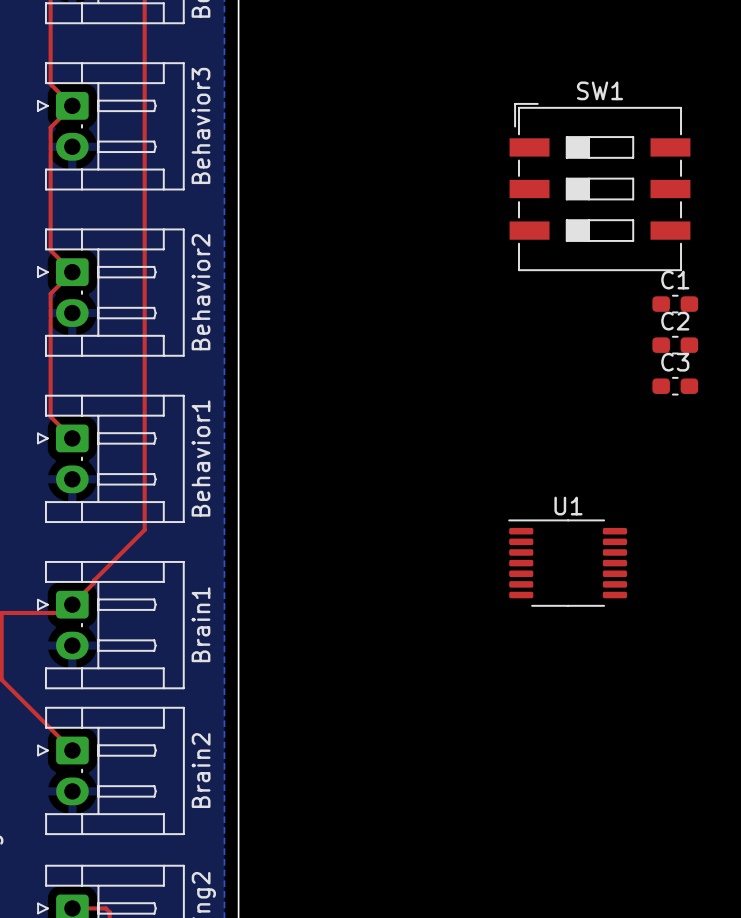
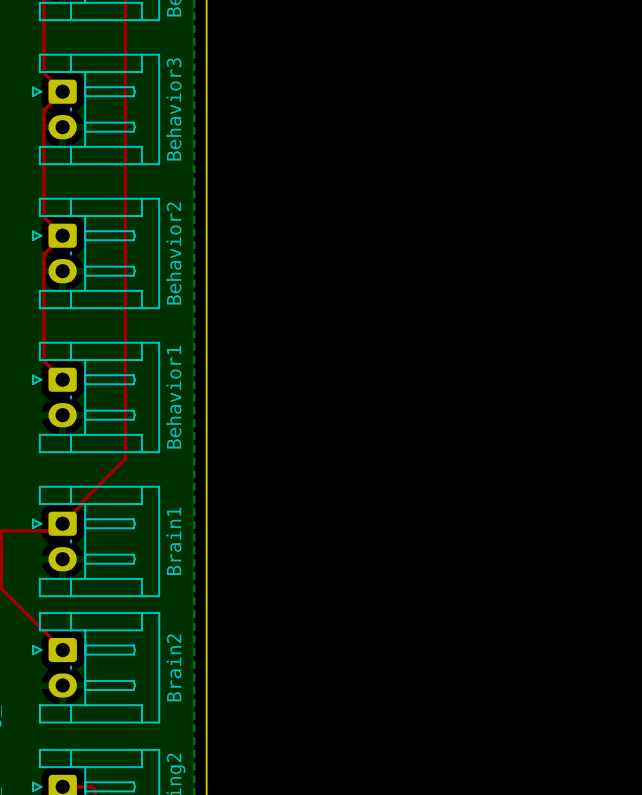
SW1: (600, 187) -> none
C1: (675, 304) -> none
C2: (675, 345) -> none
C3: (675, 386) -> none
U1: (567, 563) -> none

